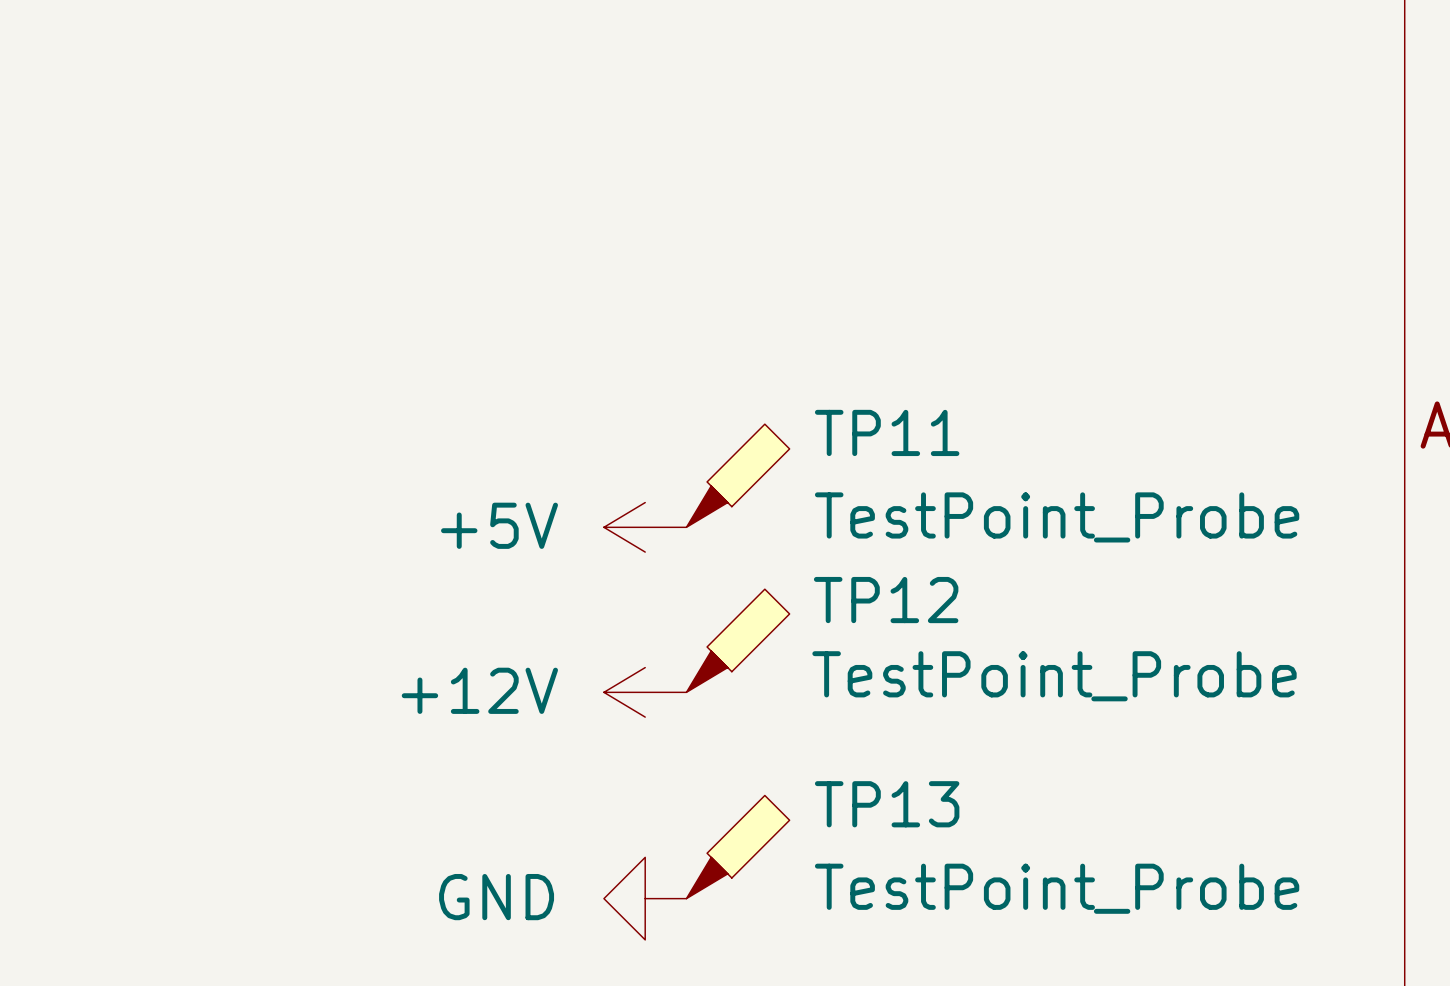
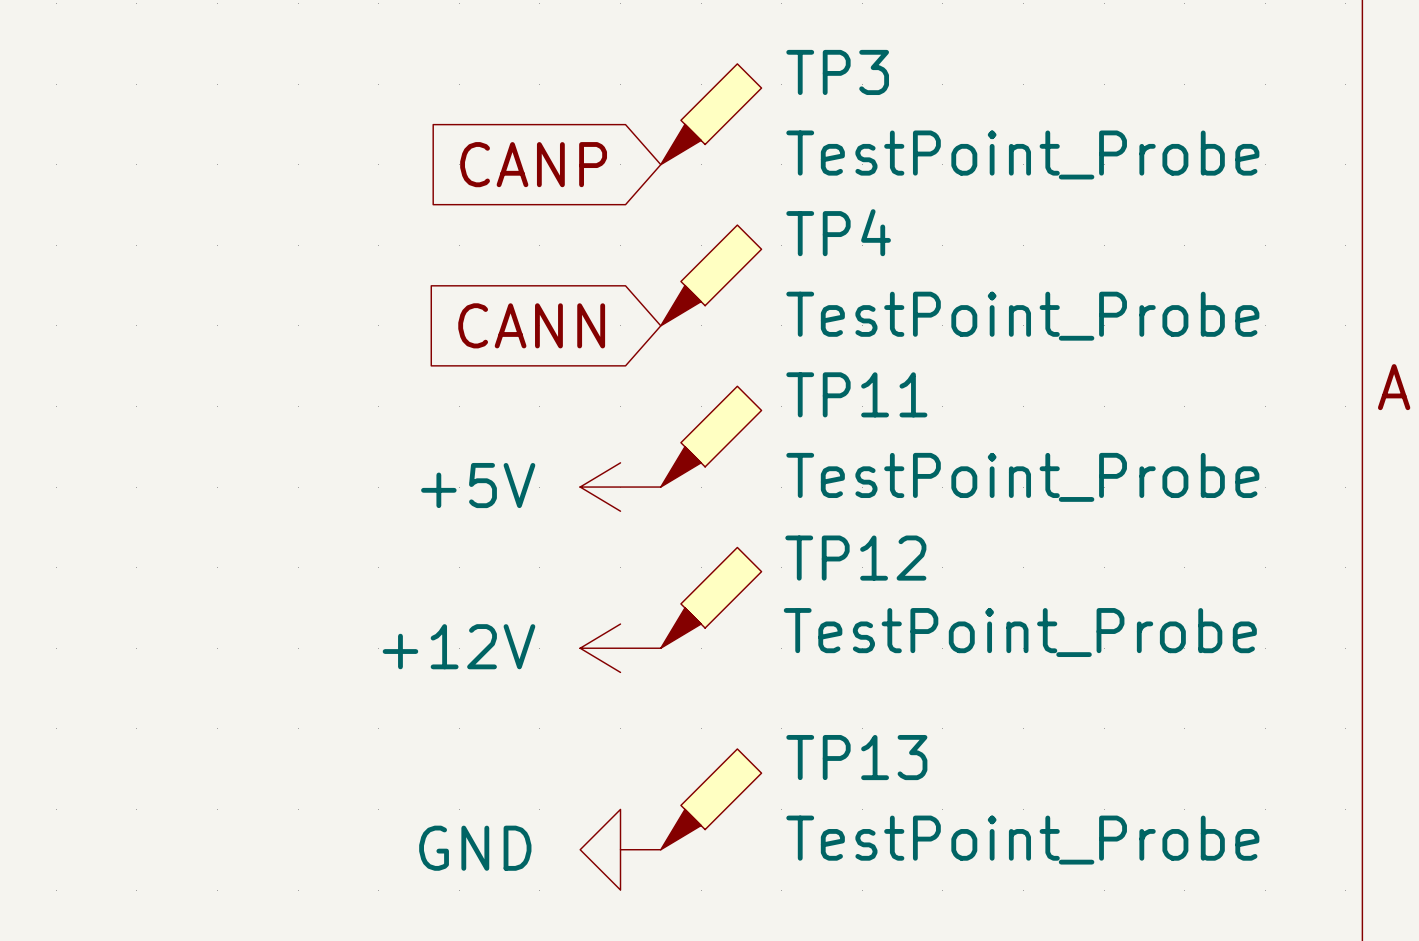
TP3: none -> TestPoint_Probe (711, 114)
global label: none -> CANP (533, 164)
TP4: none -> TestPoint_Probe (711, 275)
global label: none -> CANN (531, 325)

